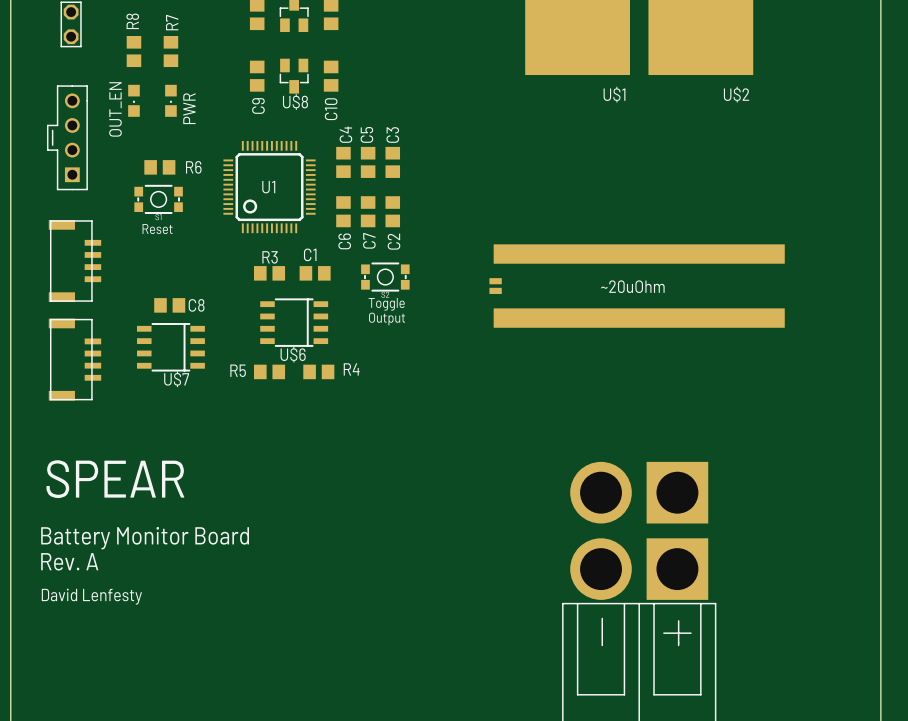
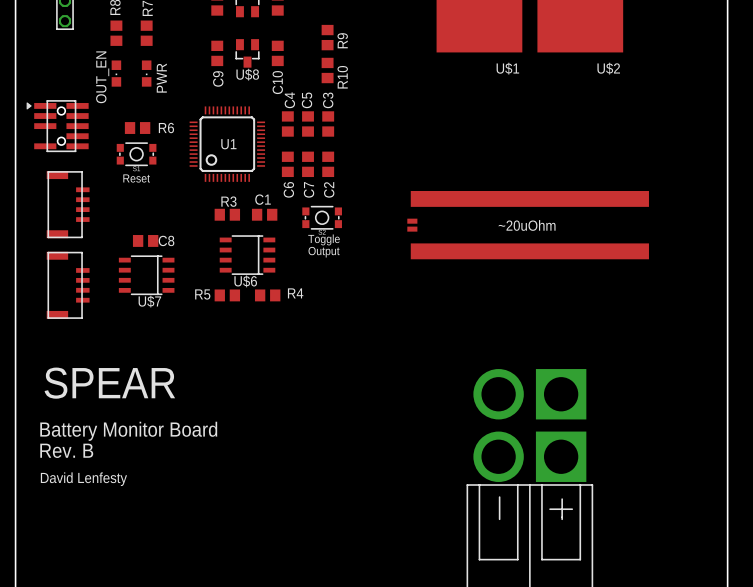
R9: none -> (327, 37)
R10: none -> (327, 70)
part: (67, 137) -> none
part: none -> (57, 126)
text: Rev. A (69, 561) -> Rev. B (66, 450)

